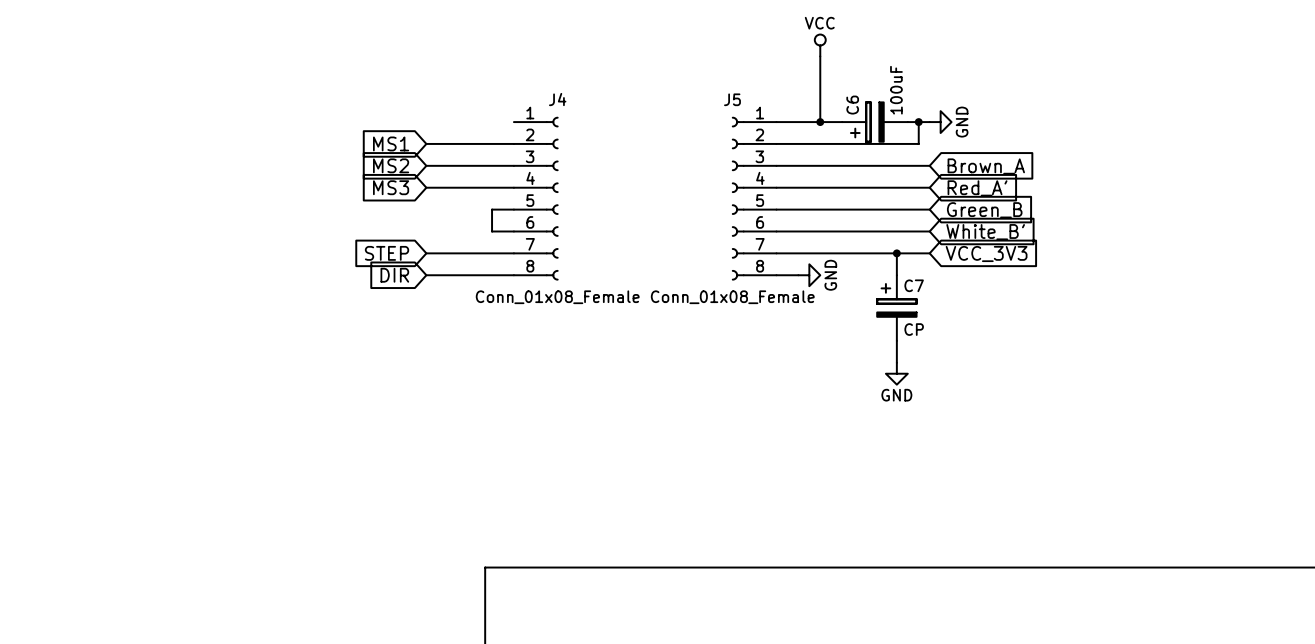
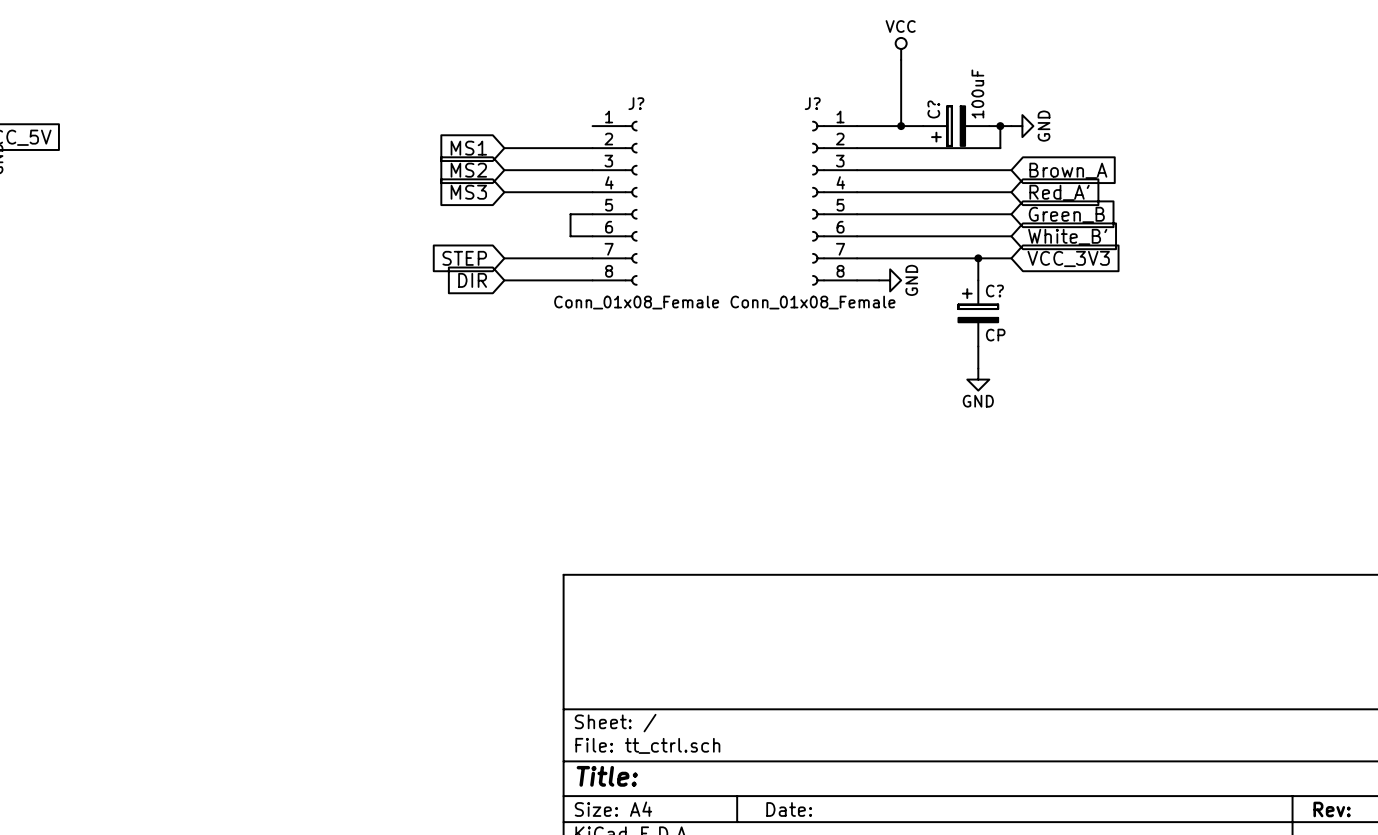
J4 name: J4 (557, 99) -> J? (636, 103)
J5 name: J5 (732, 99) -> J? (812, 103)
C6 name: C6 (852, 105) -> C? (933, 109)
C7 name: C7 (914, 285) -> C? (994, 291)

